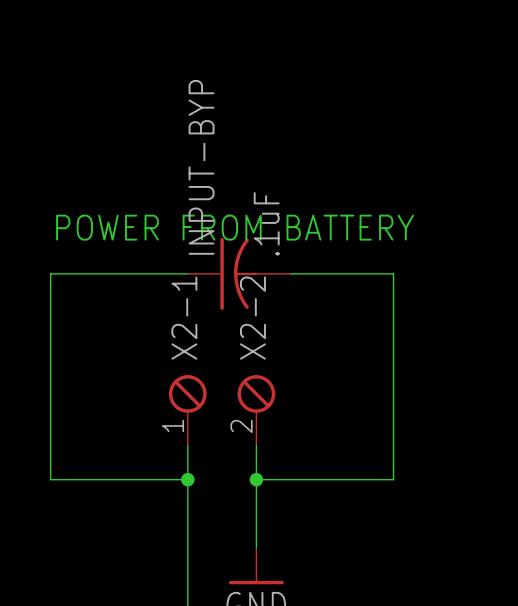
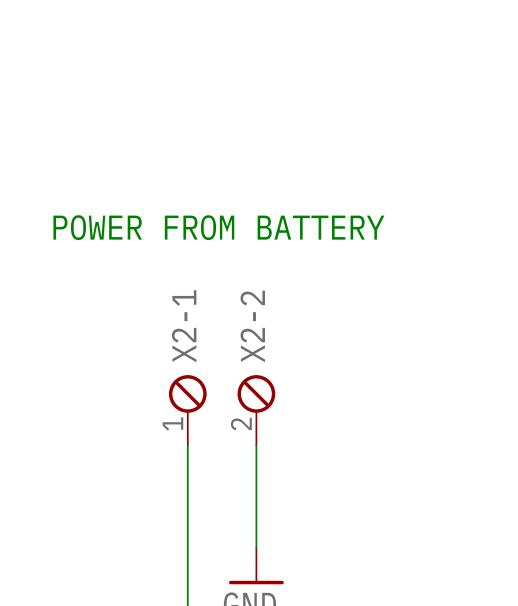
wire: (187, 273) (50, 273) (50, 479) (187, 479) -> none
INPUT-BYP: .1uF (239, 273) -> none
wire: (290, 273) (393, 273) (393, 479) (256, 479) -> none
junction: (187, 479) -> none
junction: (256, 479) -> none

